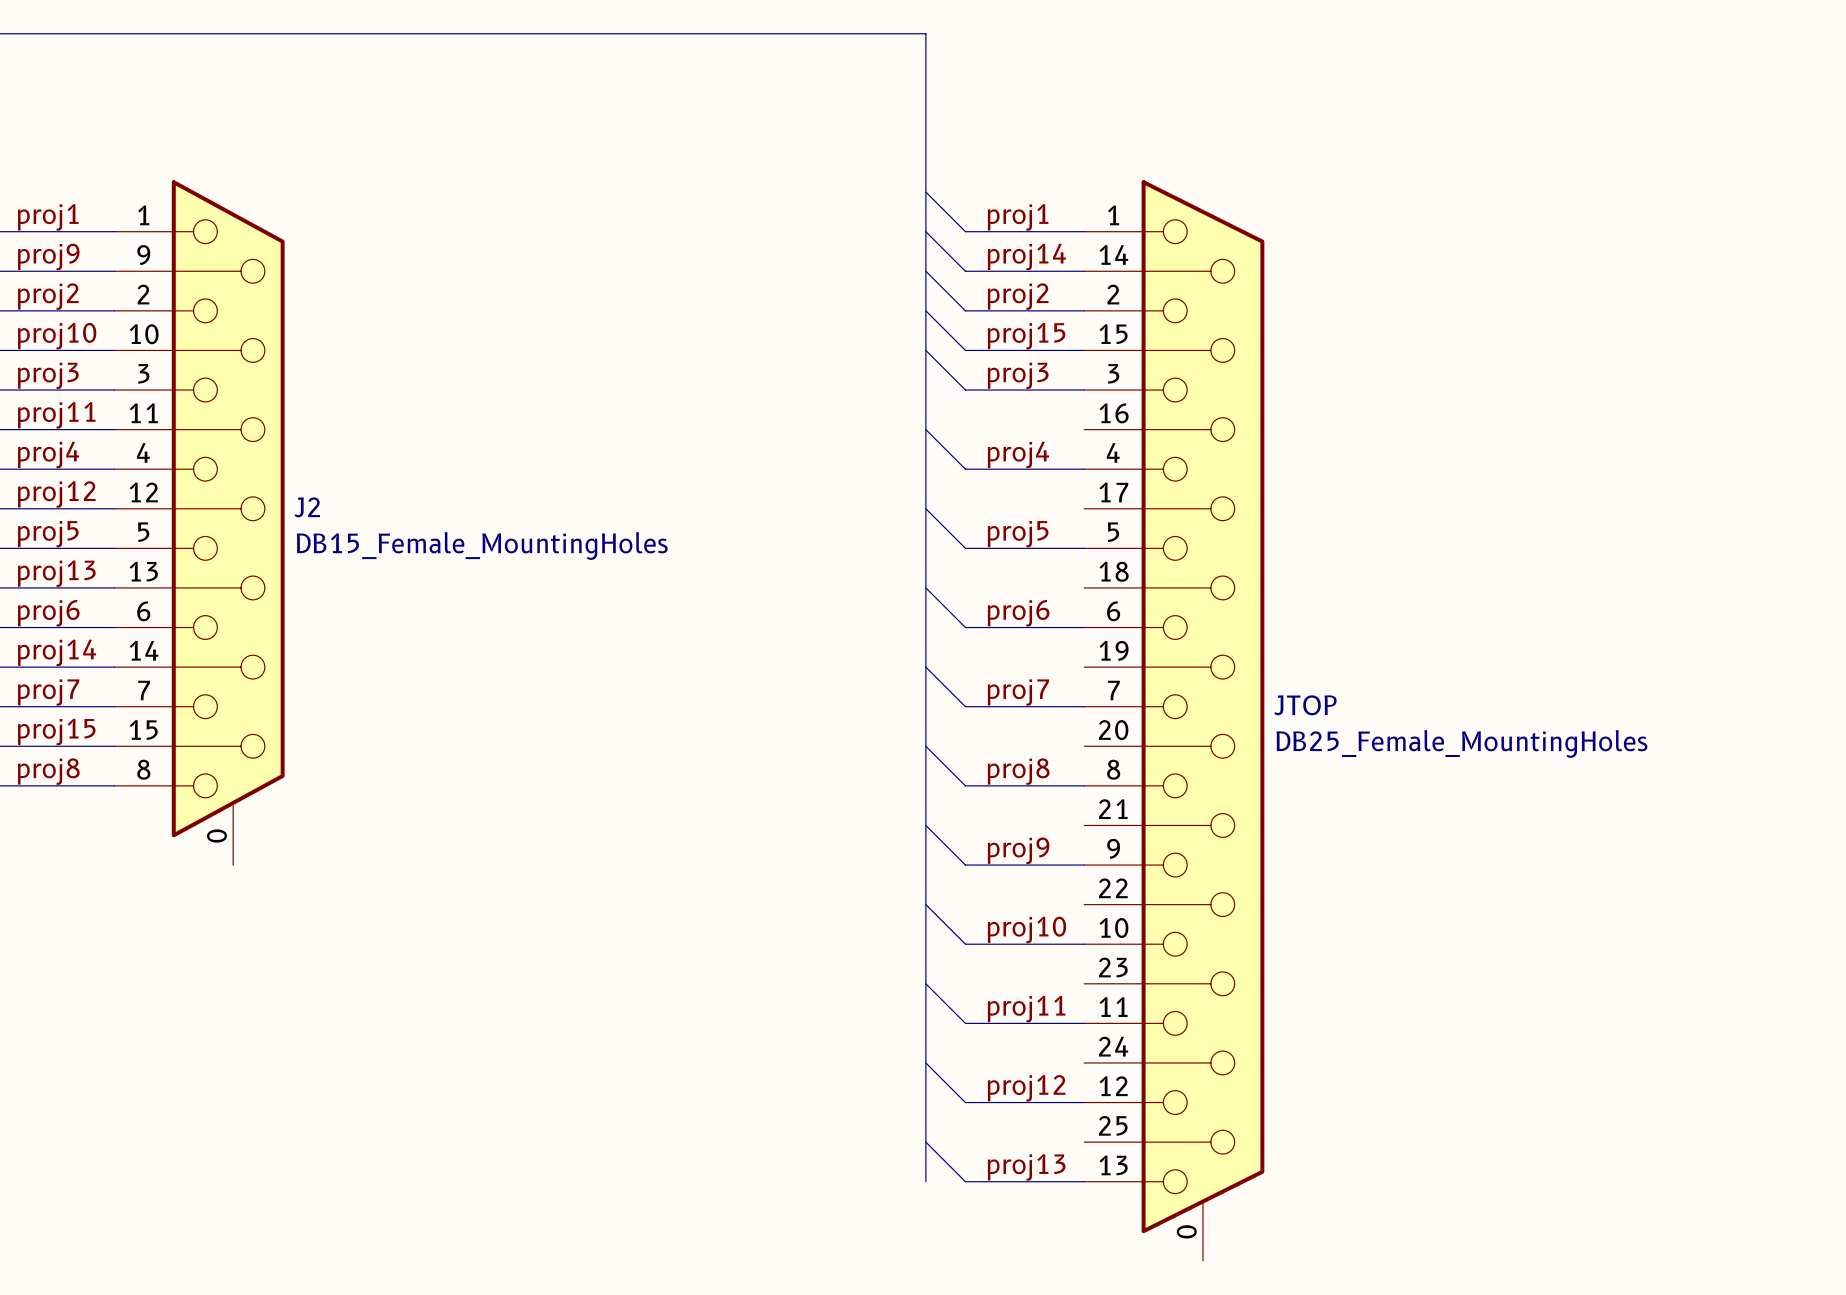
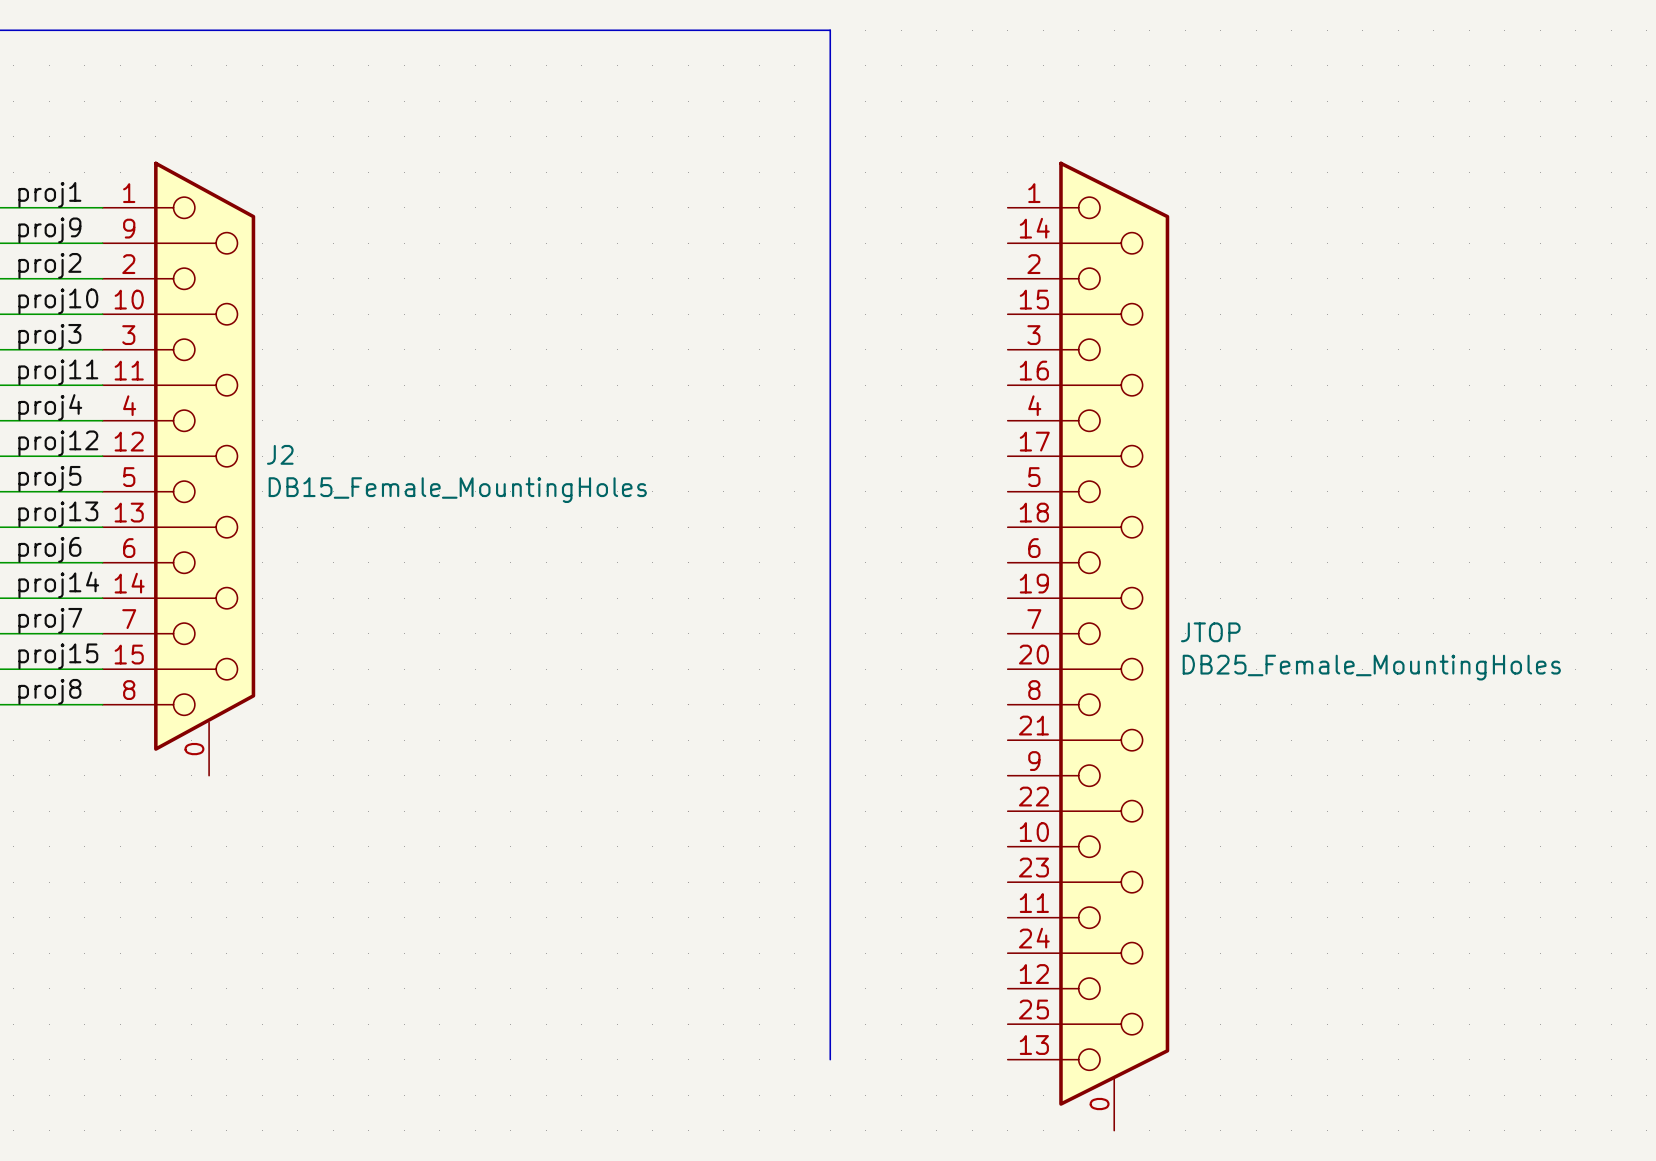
wire: (925, 192) (965, 231) (1084, 231) -> none
label: proj1 (1018, 217) -> none
wire: (925, 231) (965, 271) (1084, 271) -> none
label: proj14 (1026, 256) -> none
wire: (925, 271) (965, 310) (1084, 310) -> none
label: proj2 (1018, 296) -> none
wire: (925, 310) (965, 350) (1084, 350) -> none
label: proj15 (1026, 336) -> none
wire: (925, 350) (965, 390) (1084, 390) -> none
label: proj3 (1018, 375) -> none
wire: (925, 429) (965, 469) (1084, 469) -> none
label: proj4 (1018, 454) -> none
wire: (925, 508) (965, 548) (1084, 548) -> none
label: proj5 (1018, 534) -> none
wire: (925, 587) (965, 627) (1084, 627) -> none
label: proj6 (1018, 613) -> none
wire: (925, 667) (965, 706) (1084, 706) -> none
label: proj7 (1018, 692) -> none
JTOP position: (1174, 720) -> (1088, 646)
wire: (925, 746) (965, 785) (1084, 785) -> none
label: proj8 (1018, 771) -> none
wire: (925, 825) (965, 865) (1084, 865) -> none
label: proj9 (1018, 850) -> none
wire: (925, 904) (965, 944) (1084, 944) -> none
label: proj10 (1027, 929) -> none
wire: (925, 983) (965, 1023) (1084, 1023) -> none
label: proj11 (1026, 1009) -> none
wire: (925, 1062) (965, 1102) (1084, 1102) -> none
label: proj12 (1026, 1088) -> none
wire: (925, 1142) (965, 1181) (1084, 1181) -> none
label: proj13 (1026, 1167) -> none

